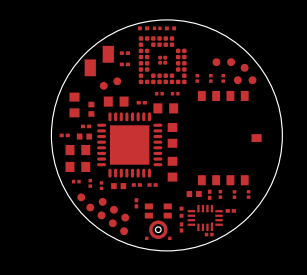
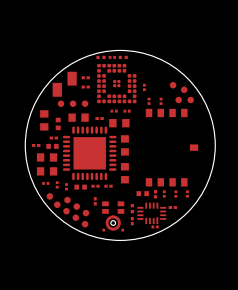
part: (216, 62) -> none
part: none -> (144, 87)
part: (197, 78) -> none
part: (210, 78) -> none
part: (223, 78) -> none
part: (117, 81) -> none
part: none -> (149, 101)
part: none -> (161, 101)
part: none -> (60, 103)
part: none -> (73, 103)
part: none -> (85, 103)
part: (103, 85) -> none

